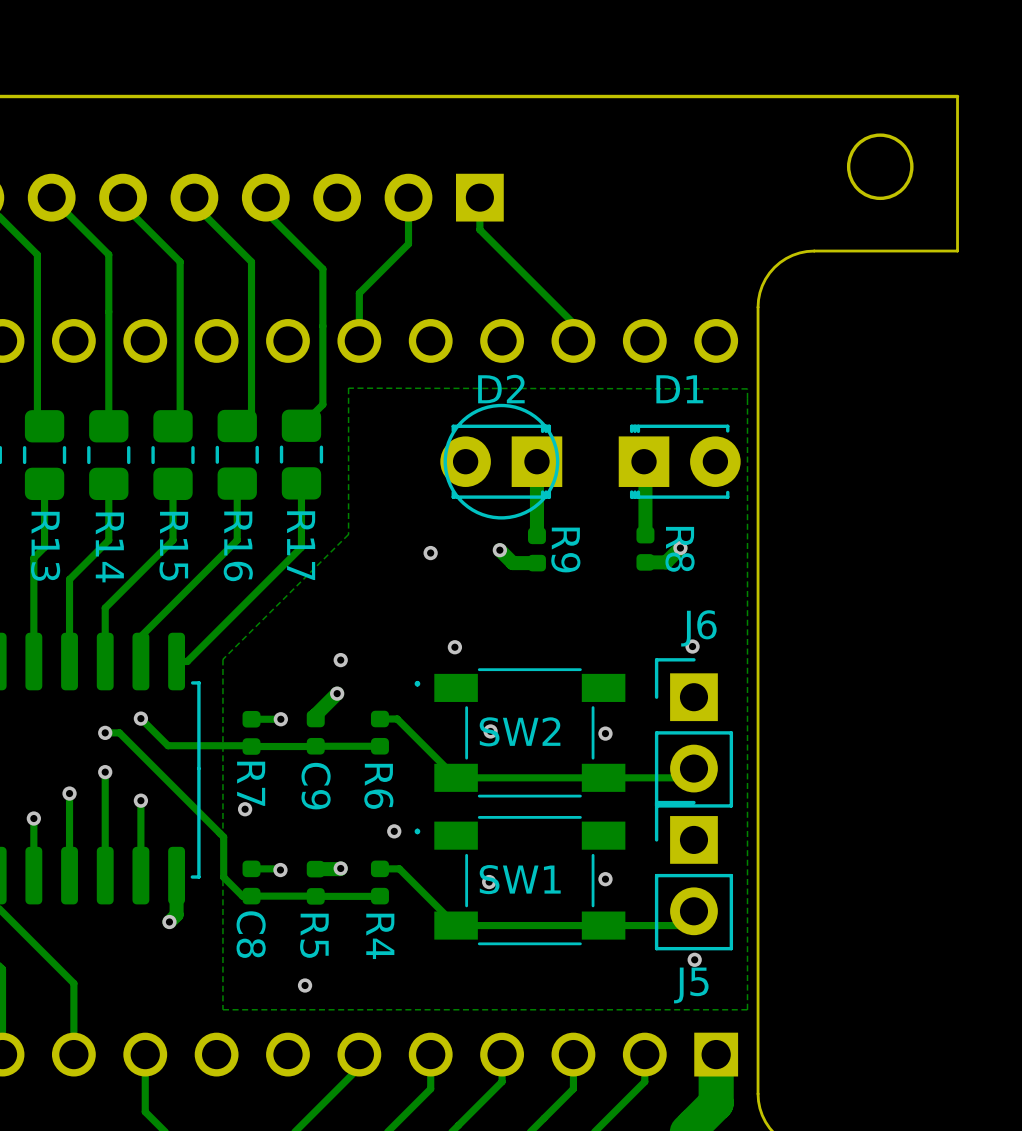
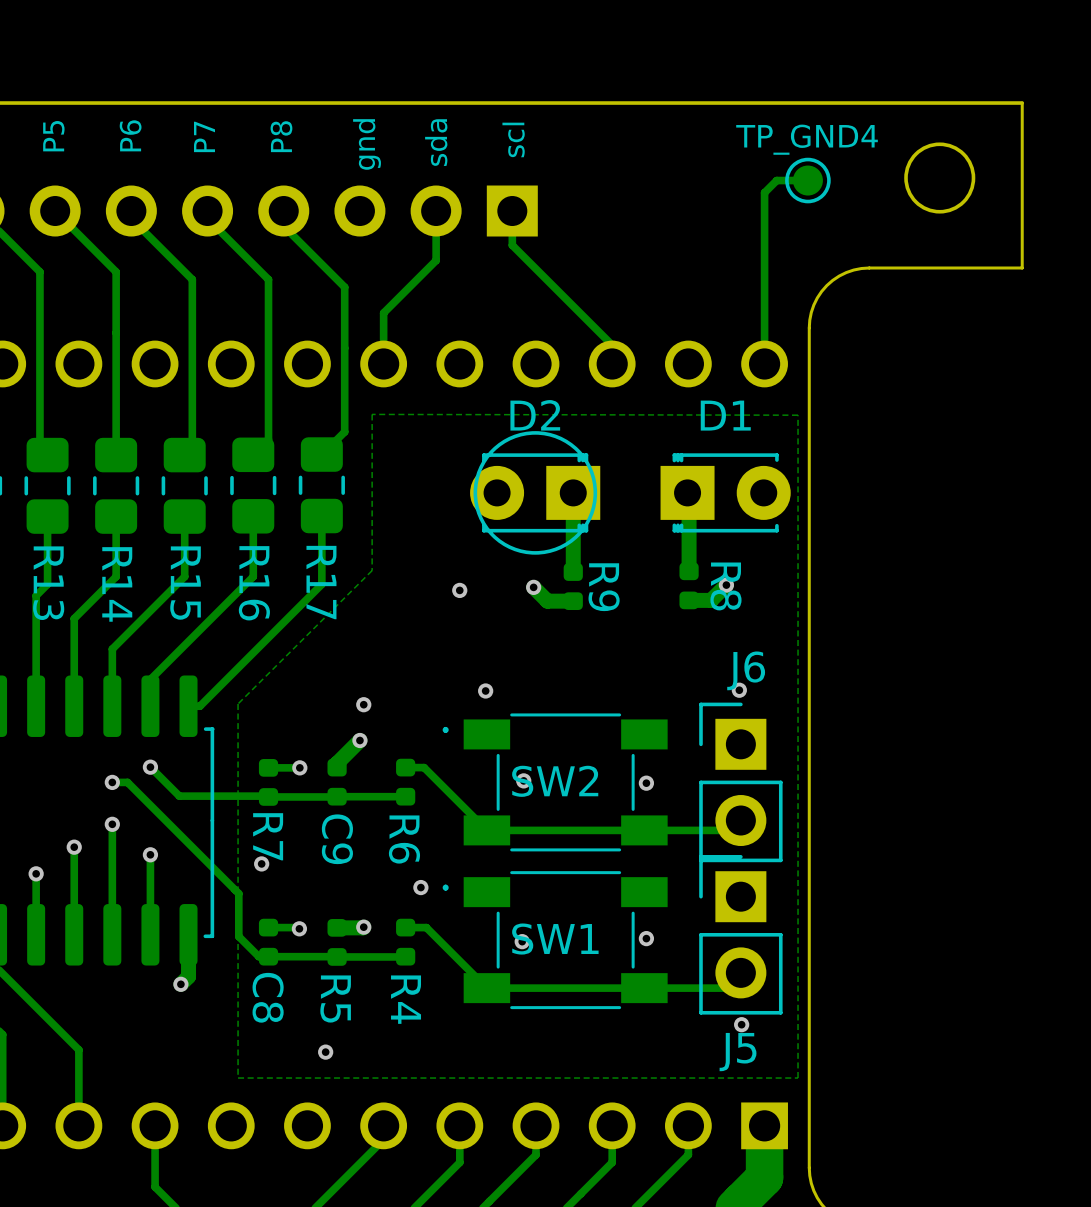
text: none -> P5 (53, 136)
text: none -> P6 (130, 135)
text: none -> P7 (204, 136)
text: none -> P8 (281, 136)
text: none -> scl (513, 139)
text: none -> sda (436, 142)
text: none -> gnd (367, 144)
track: none -> (807, 180) (776, 180) (764, 192) (764, 363)
TP_GND4: none -> (807, 180)

